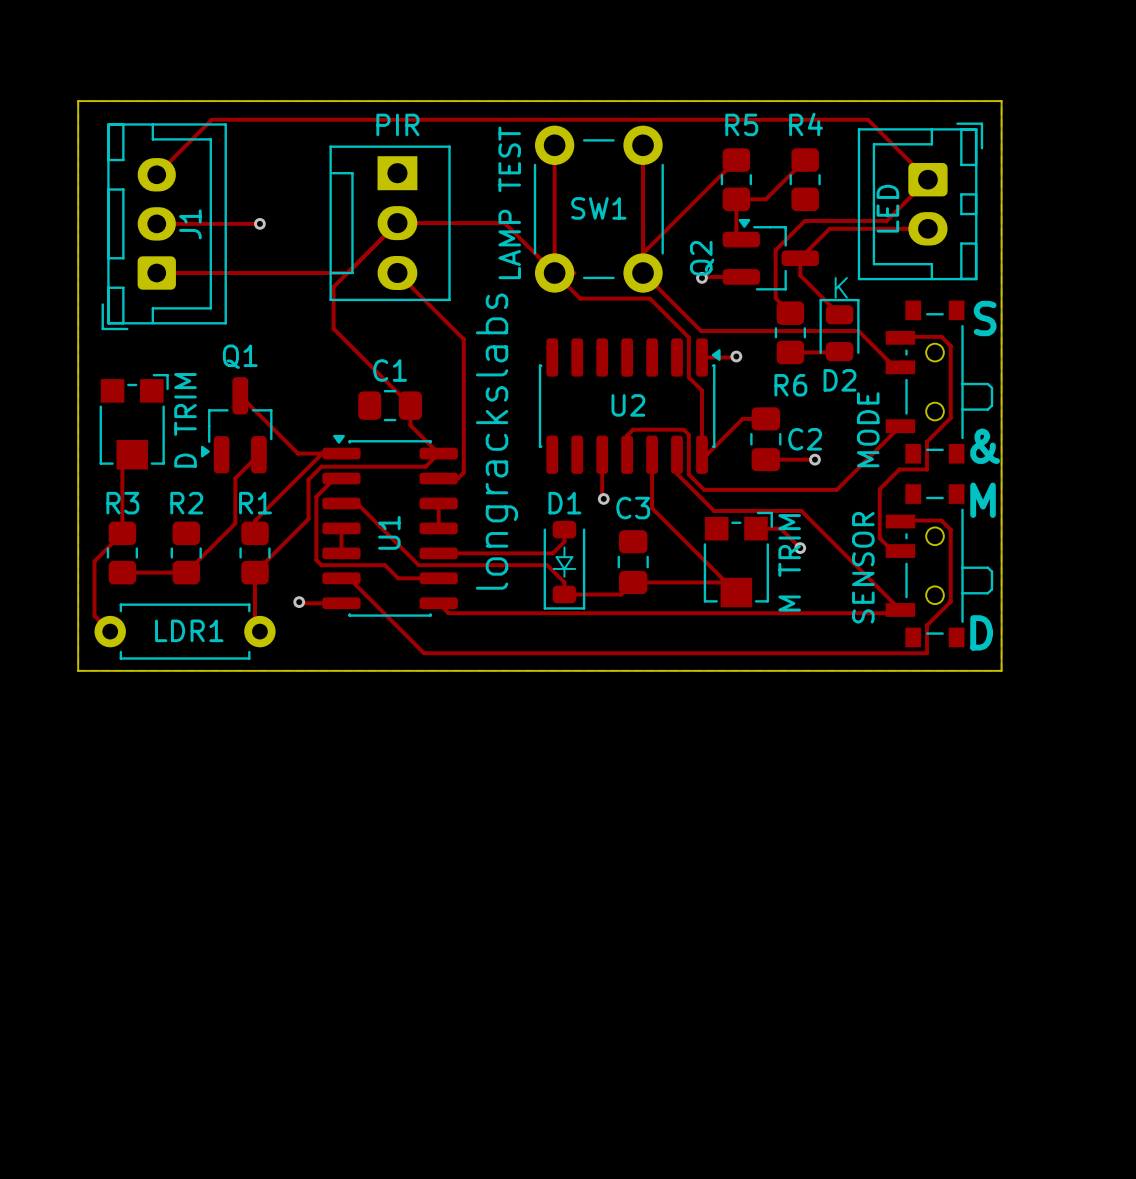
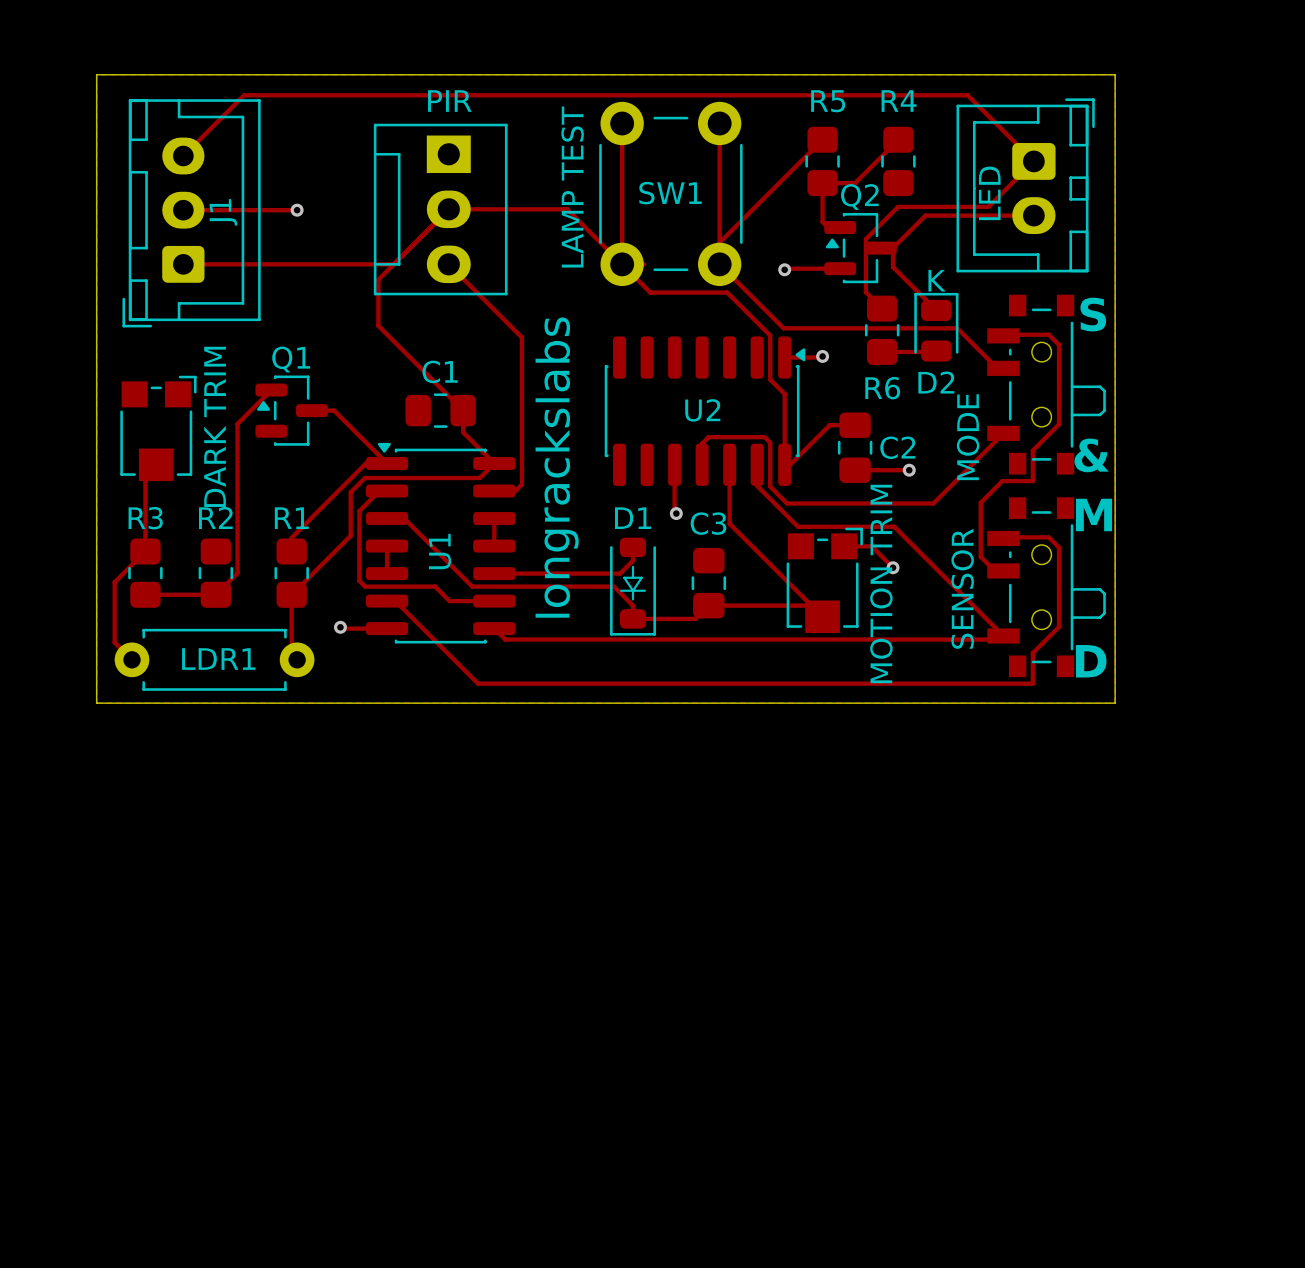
Q2 footprint: [722, 218, 819, 291] -> [824, 213, 897, 284]
Q2 name position: Q2 (702, 258) -> Q2 (859, 197)
Q1 footprint: [200, 377, 273, 474] -> [255, 375, 328, 446]
top track: (240, 395) (298, 453) (322, 453) -> none
top track: none -> (312, 410) (334, 410) (387, 463)
part value: D TRIM (185, 420) -> DARK TRIM (215, 426)
top track: (258, 454) (235, 478) (235, 523) (205, 552) -> (271, 390) (237, 423) (237, 573)
part value: M TRIM (789, 562) -> MOTION TRIM (881, 583)

